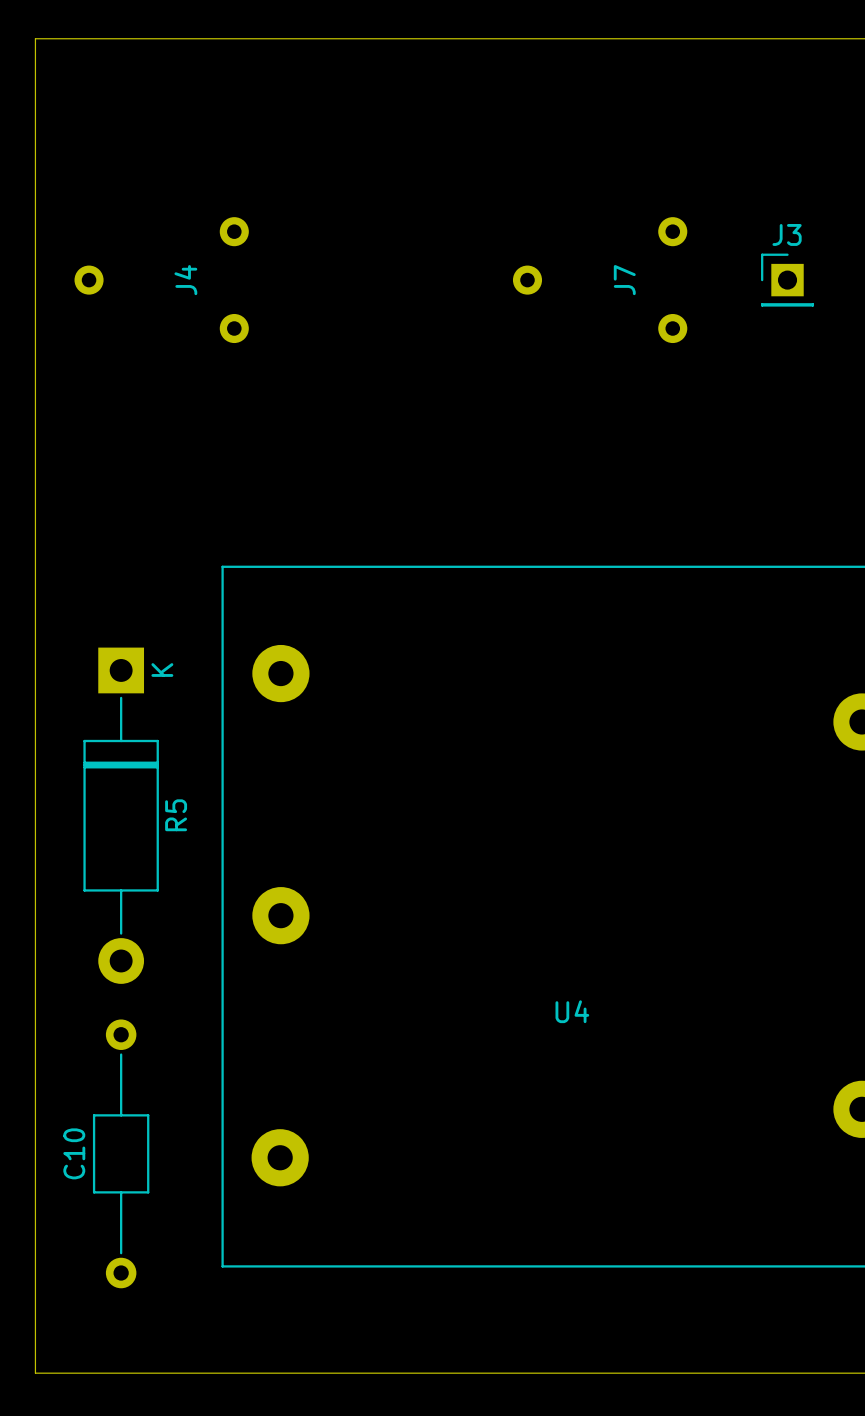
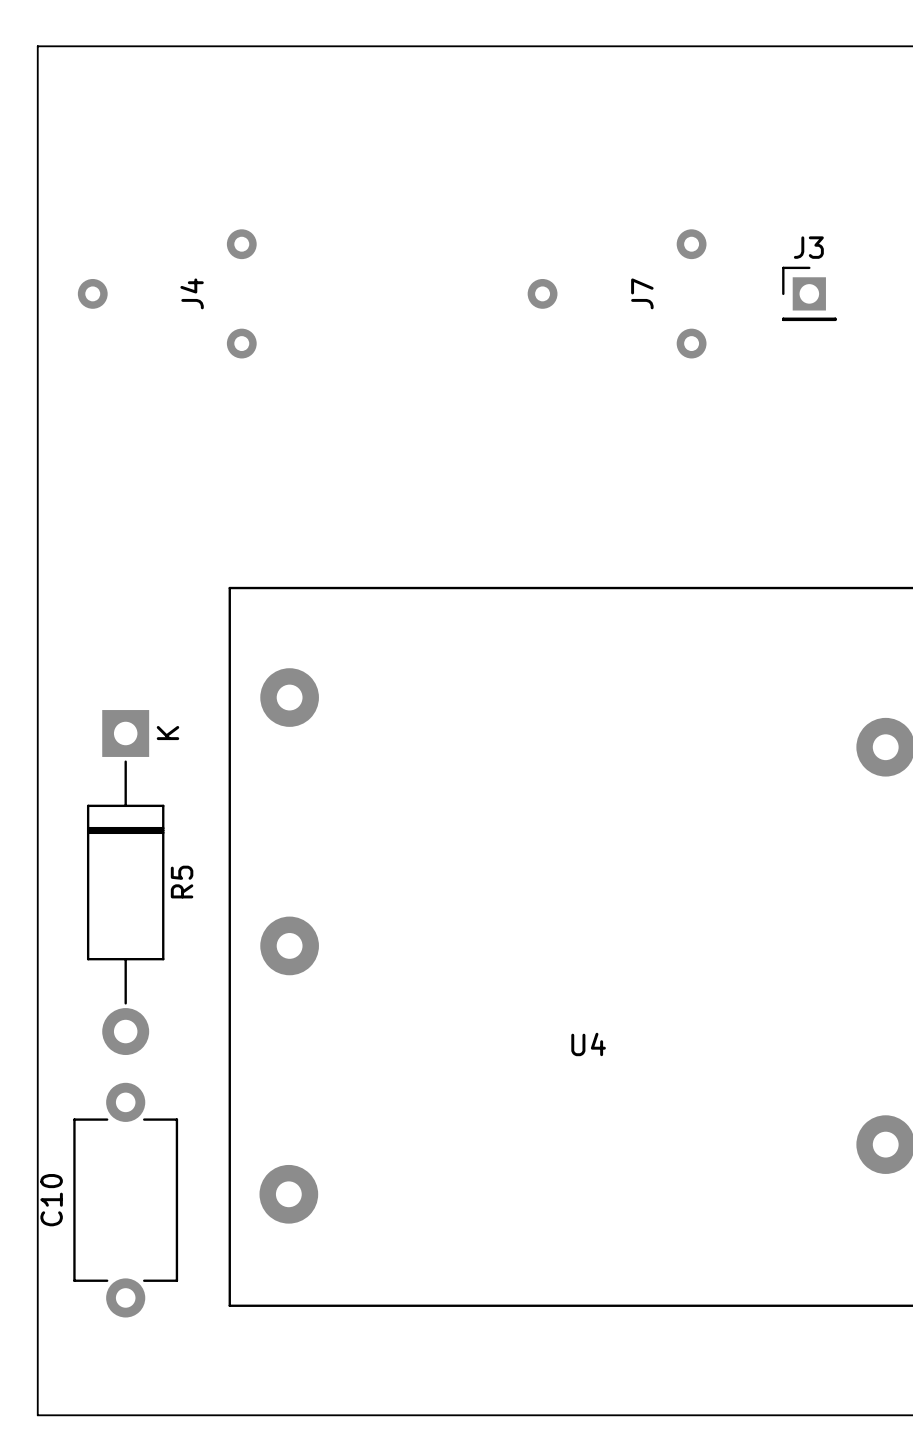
R5 position: (121, 815) -> (125, 882)
C10 footprint: [92, 1019, 150, 1289] -> [73, 1082, 179, 1318]

